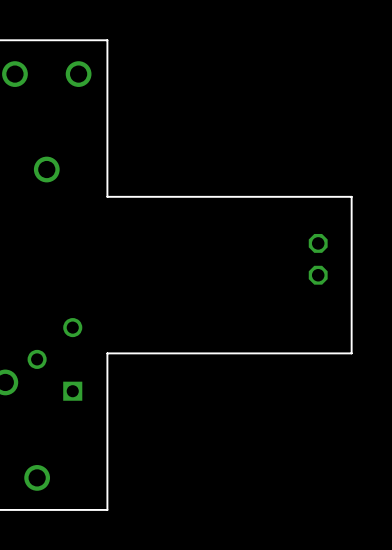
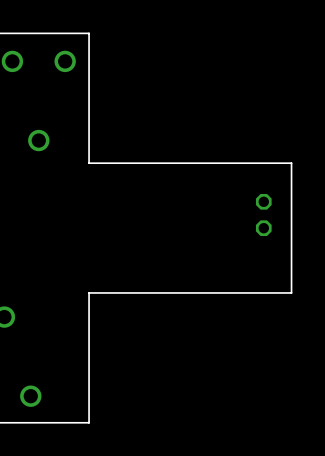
part: (54, 359) -> none

